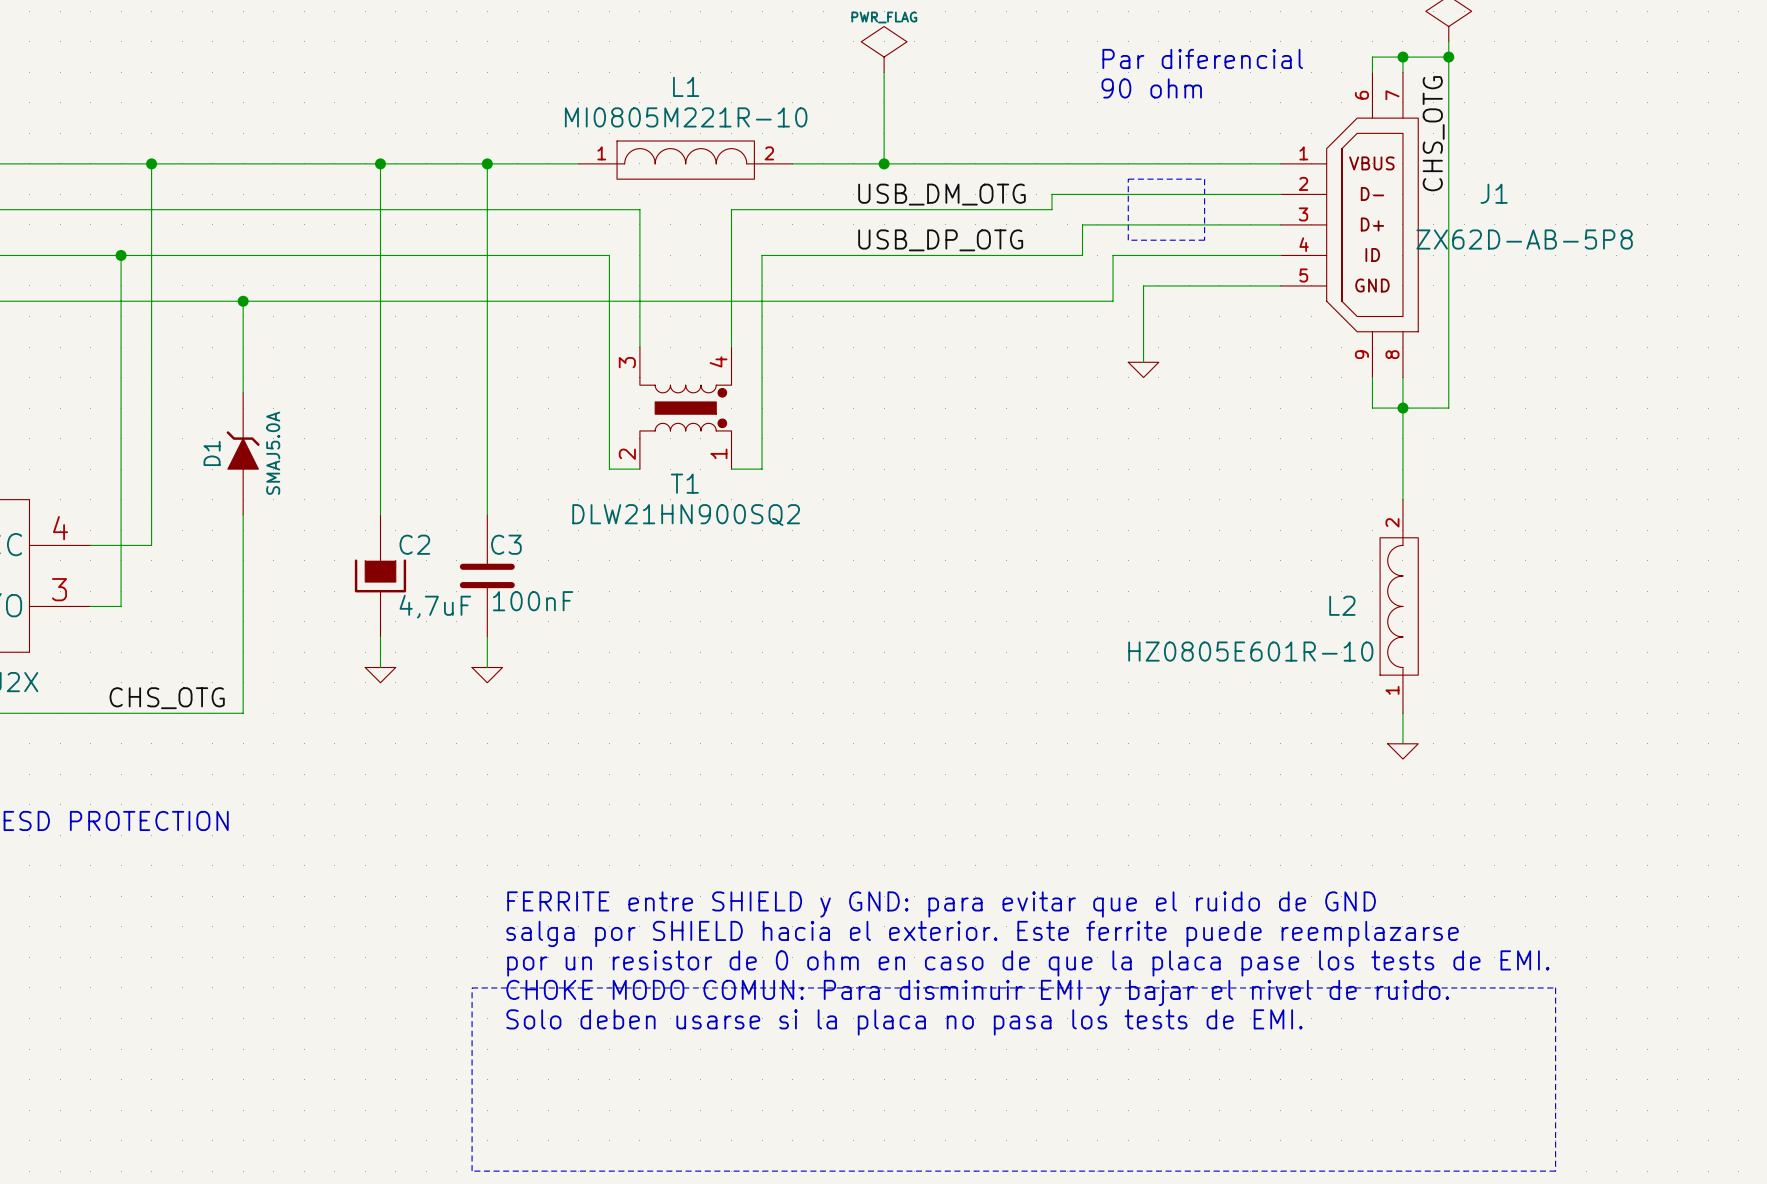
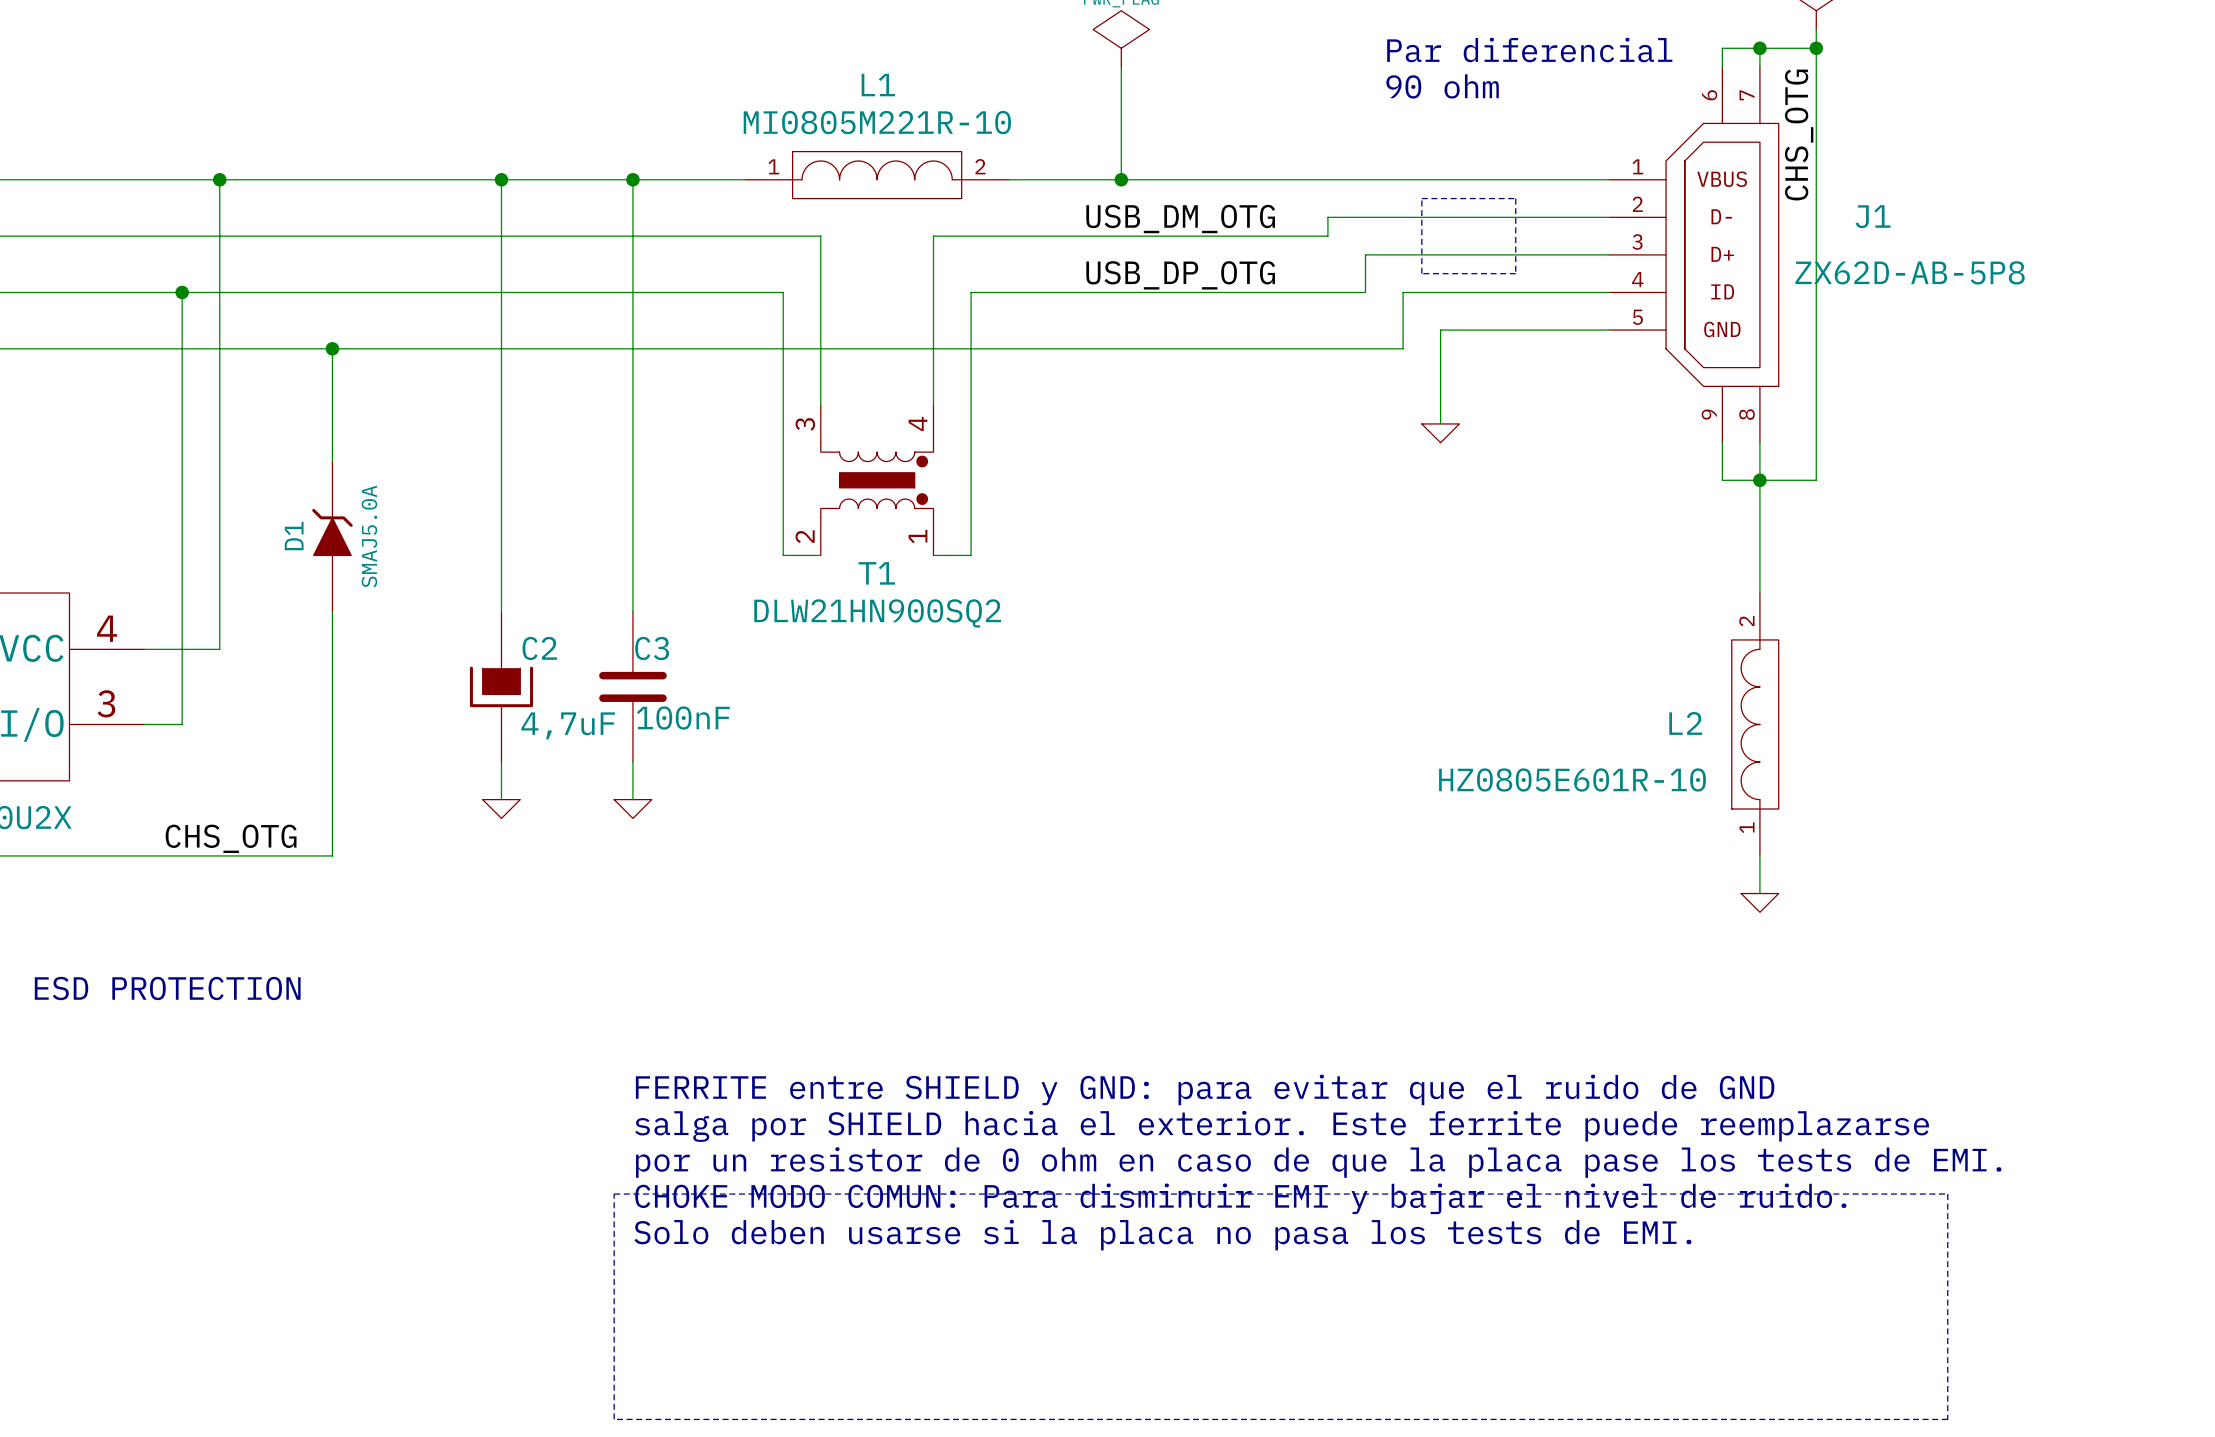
text position: FERRITE entre SHIELD y GND: para evitar que el ruido de GND (941, 904) -> FERRITE entre SHIELD y GND: para evitar que el ruido de GND (1205, 1089)
text position: salga por SHIELD hacia el exterior. Este ferrite puede reemplazarse (982, 933) -> salga por SHIELD hacia el exterior. Este ferrite puede reemplazarse (1282, 1126)
text position: por un resistor de 0 ohm en caso de que la placa pase los tests de EMI. (1028, 963) -> por un resistor de 0 ohm en caso de que la placa pase los tests de EMI. (1318, 1162)
text position: CHOKE MODO COMUN: Para disminuir EMI y bajar el nivel de ruido. (977, 992) -> CHOKE MODO COMUN: Para disminuir EMI y bajar el nivel de ruido. (1240, 1198)
text position: Solo deben usarse si la placa no pasa los tests de EMI. (904, 1022) -> Solo deben usarse si la placa no pasa los tests de EMI. (1162, 1235)

